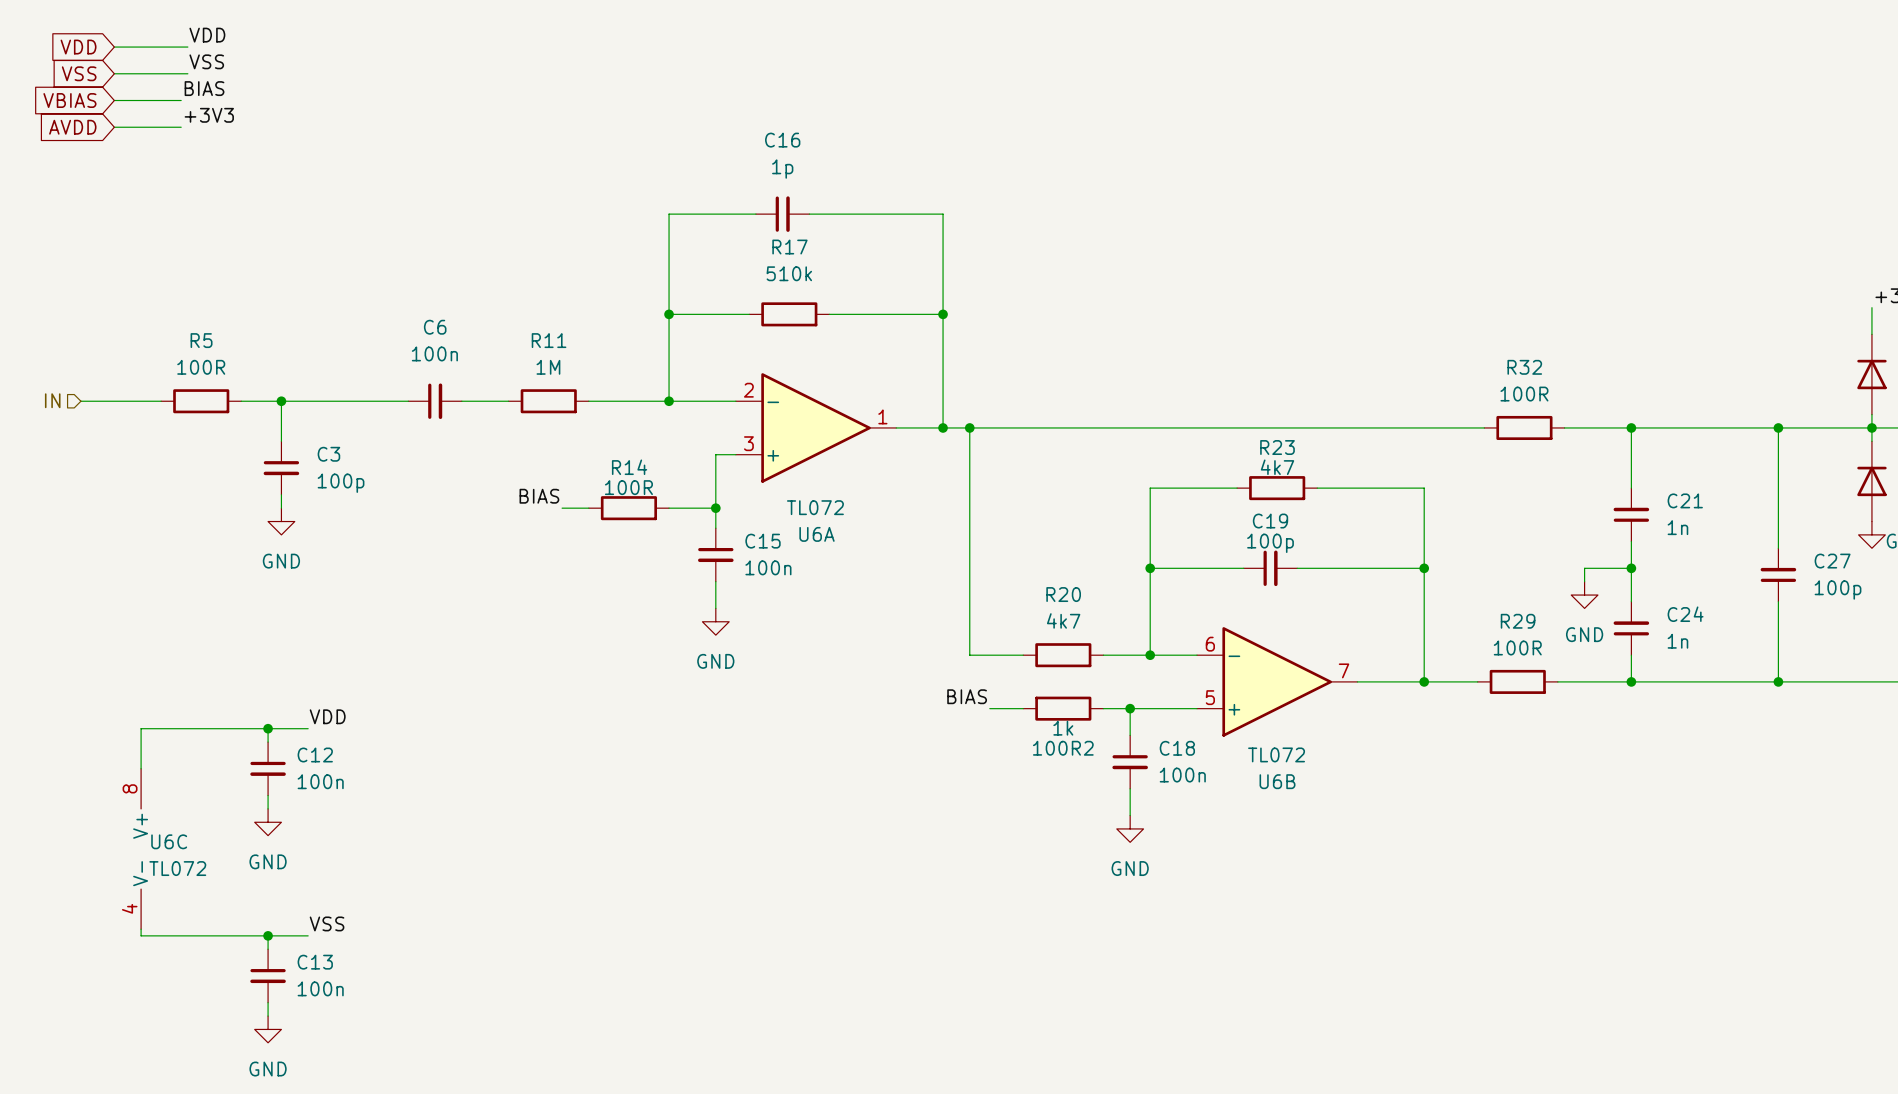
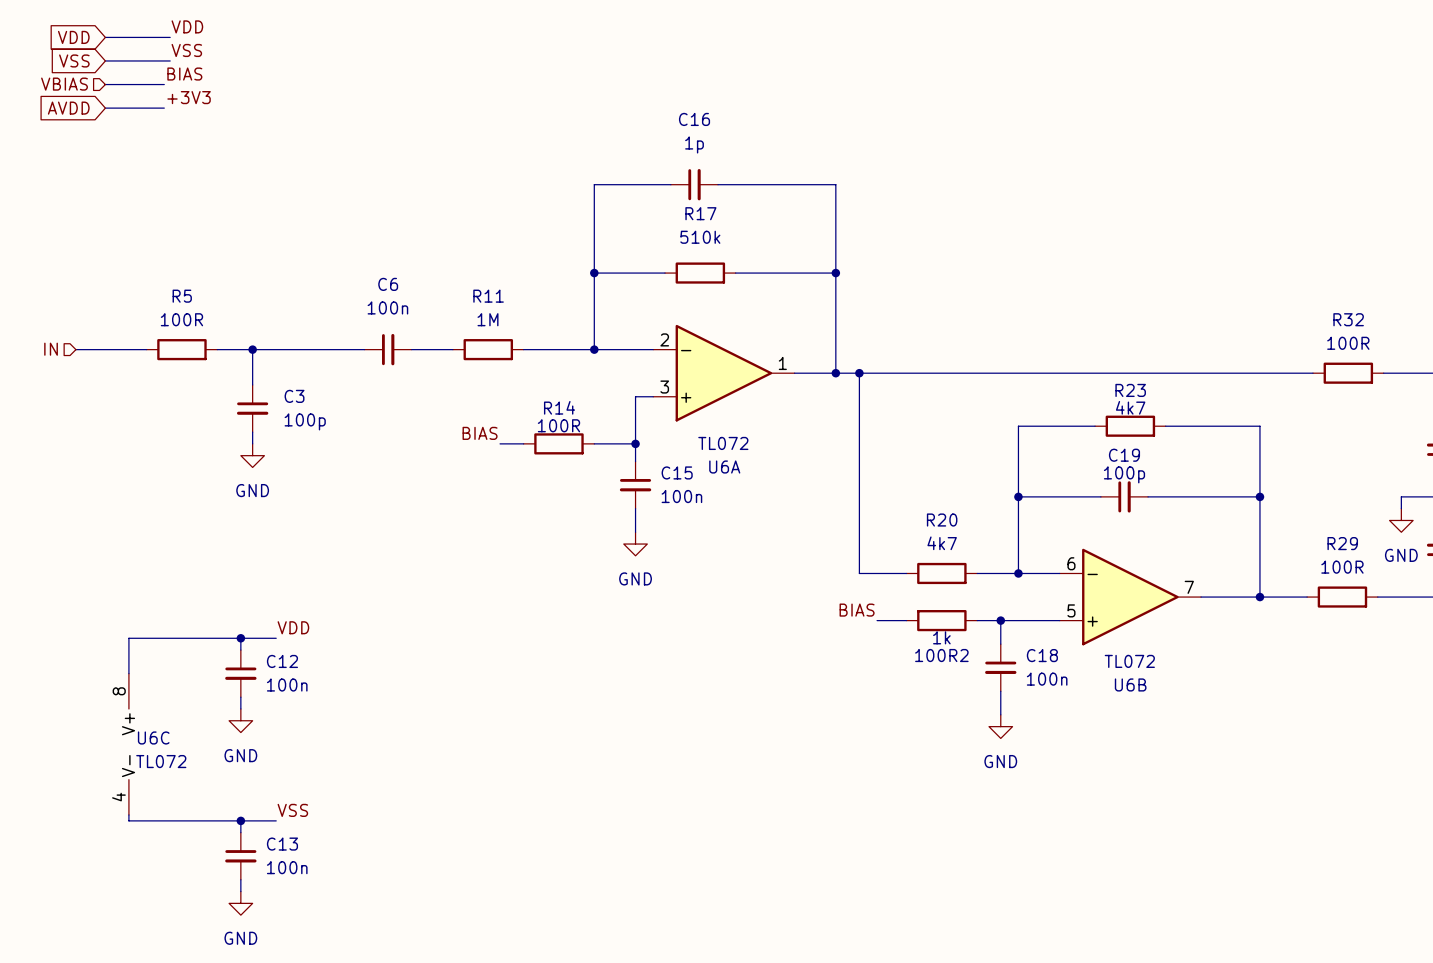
hierarchical label: none -> VBIAS (64, 84)
global label: VBIAS (69, 100) -> none

